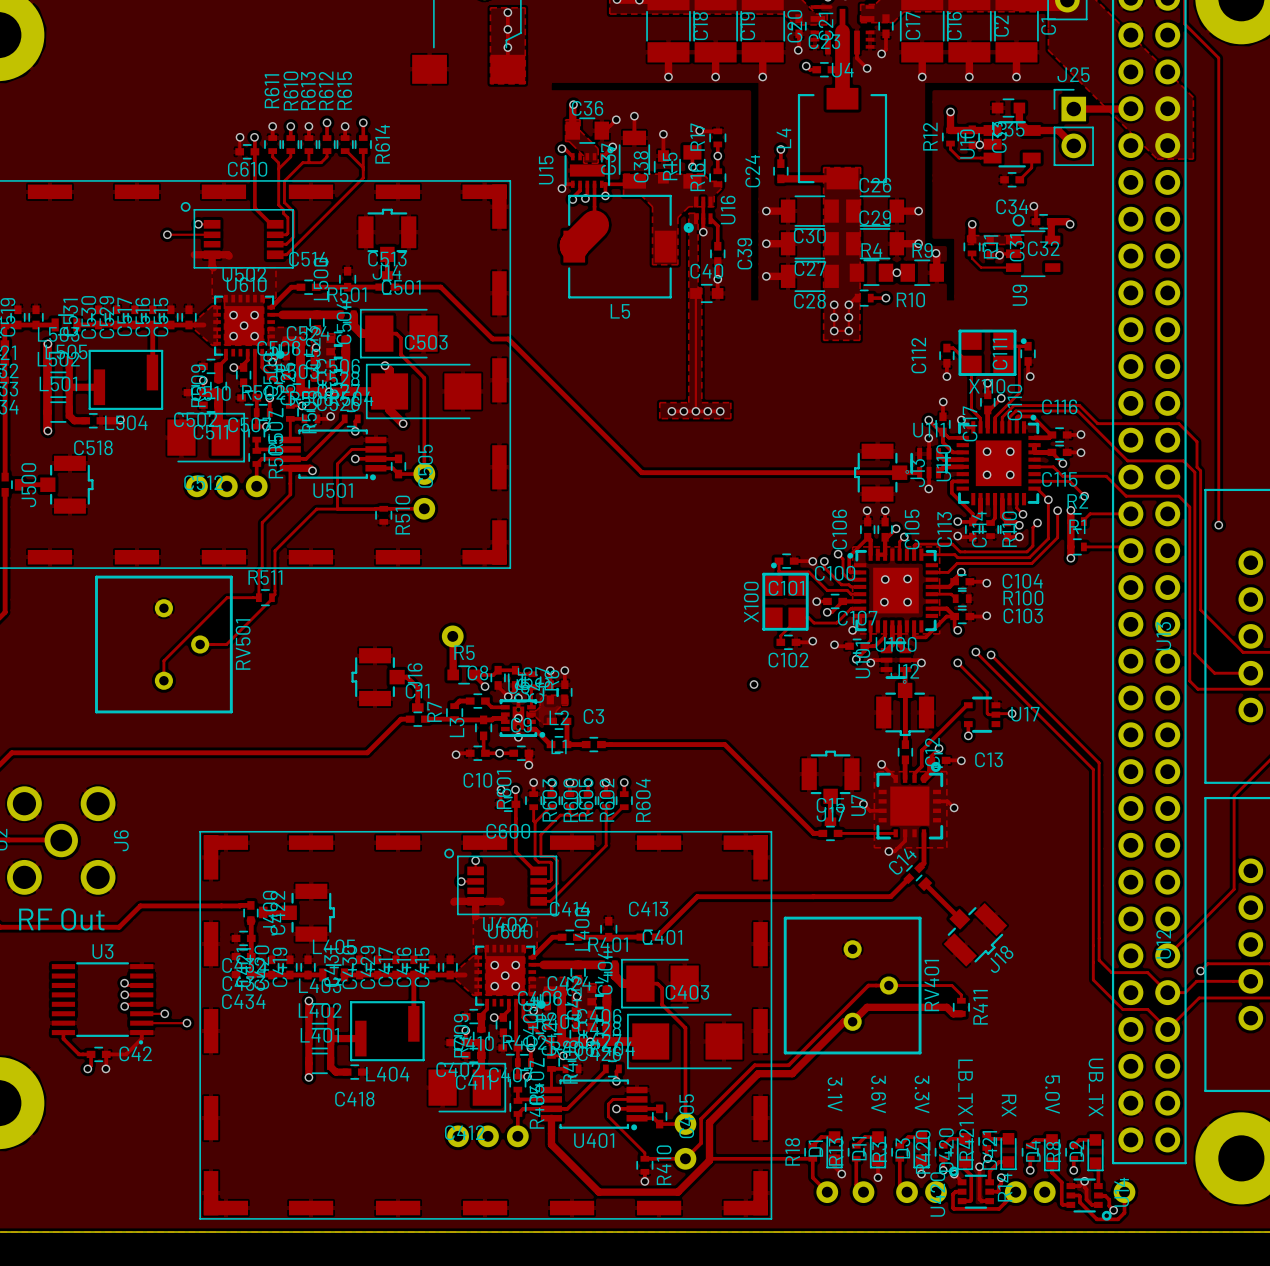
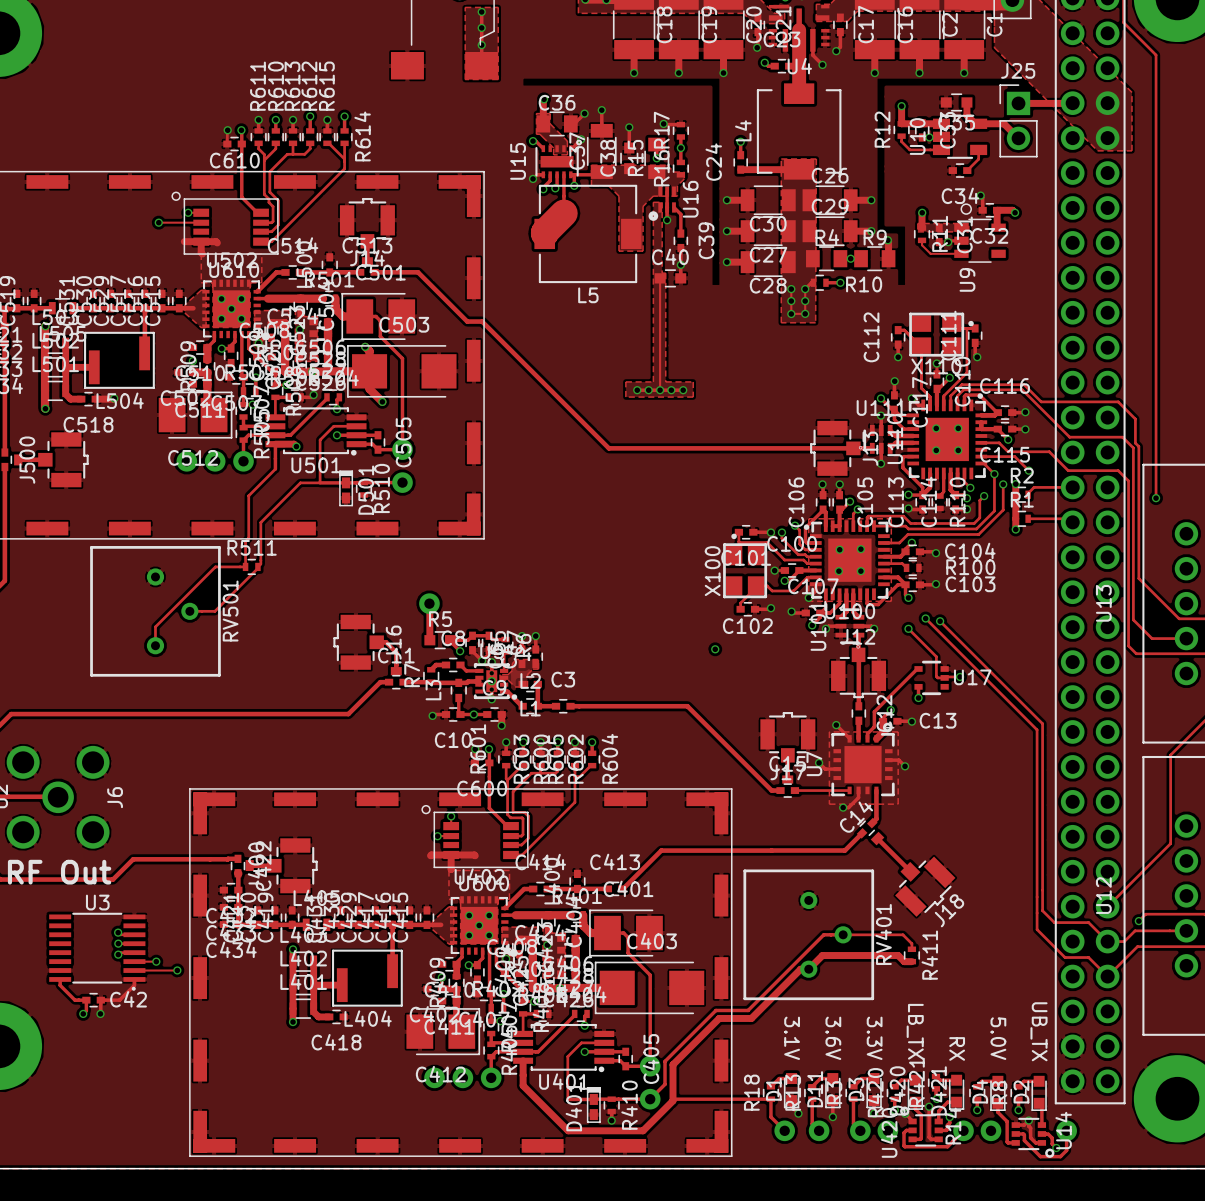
D501: none -> (346, 488)
track: (608, 1104) (608, 1116) (644, 1153) (644, 1158) -> (577, 1047) (567, 1056) (567, 1099) (611, 1099)
D401: none -> (593, 1104)

